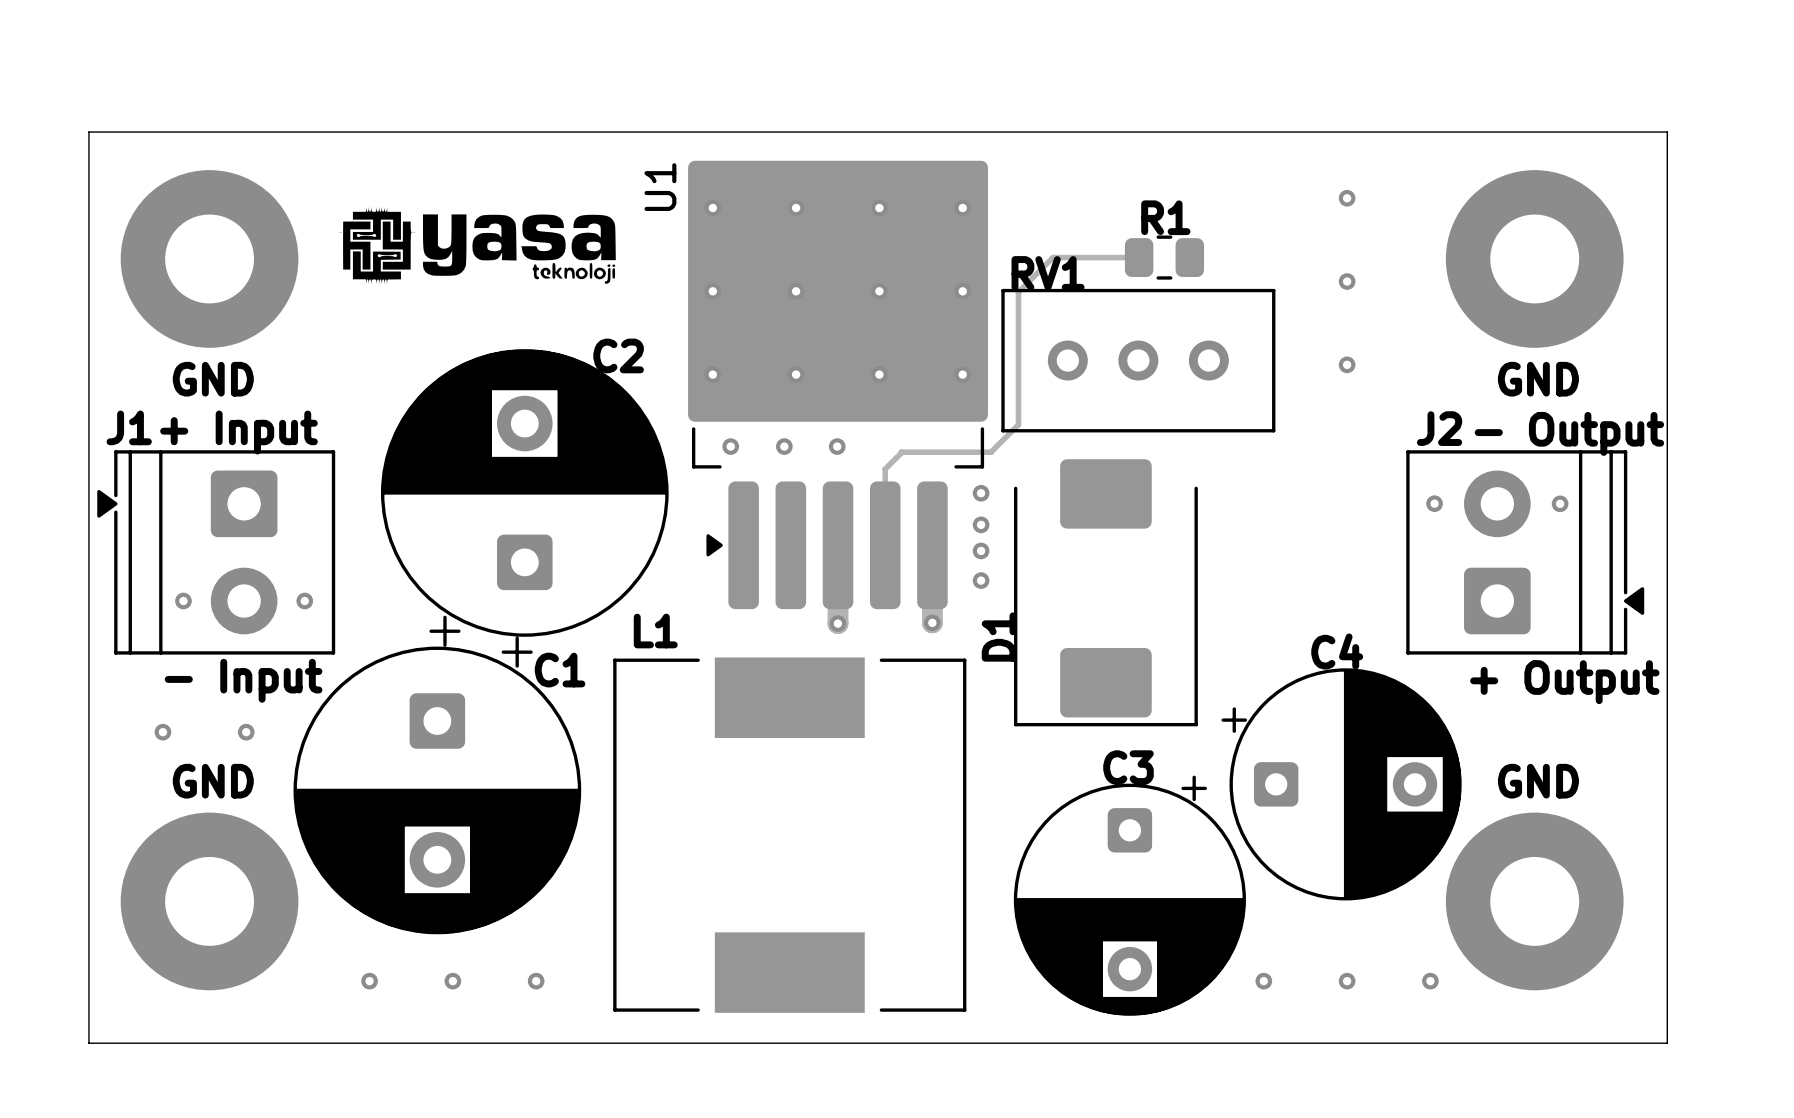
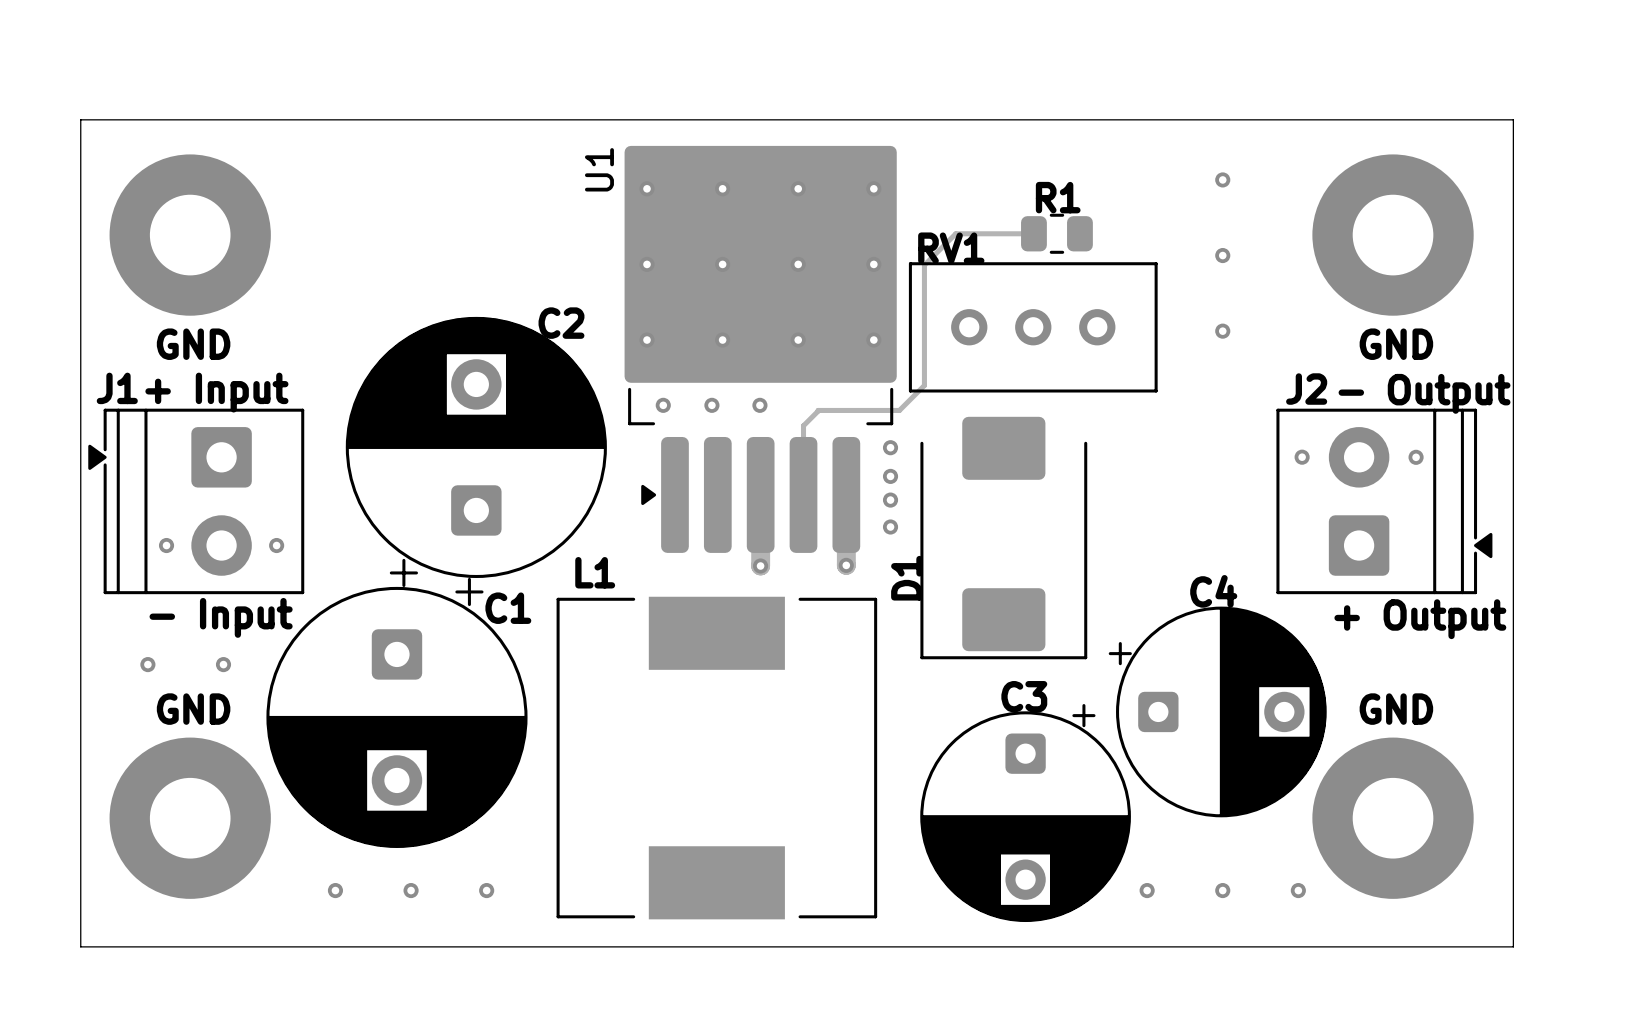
drawing: [339, 206, 616, 285] -> none

